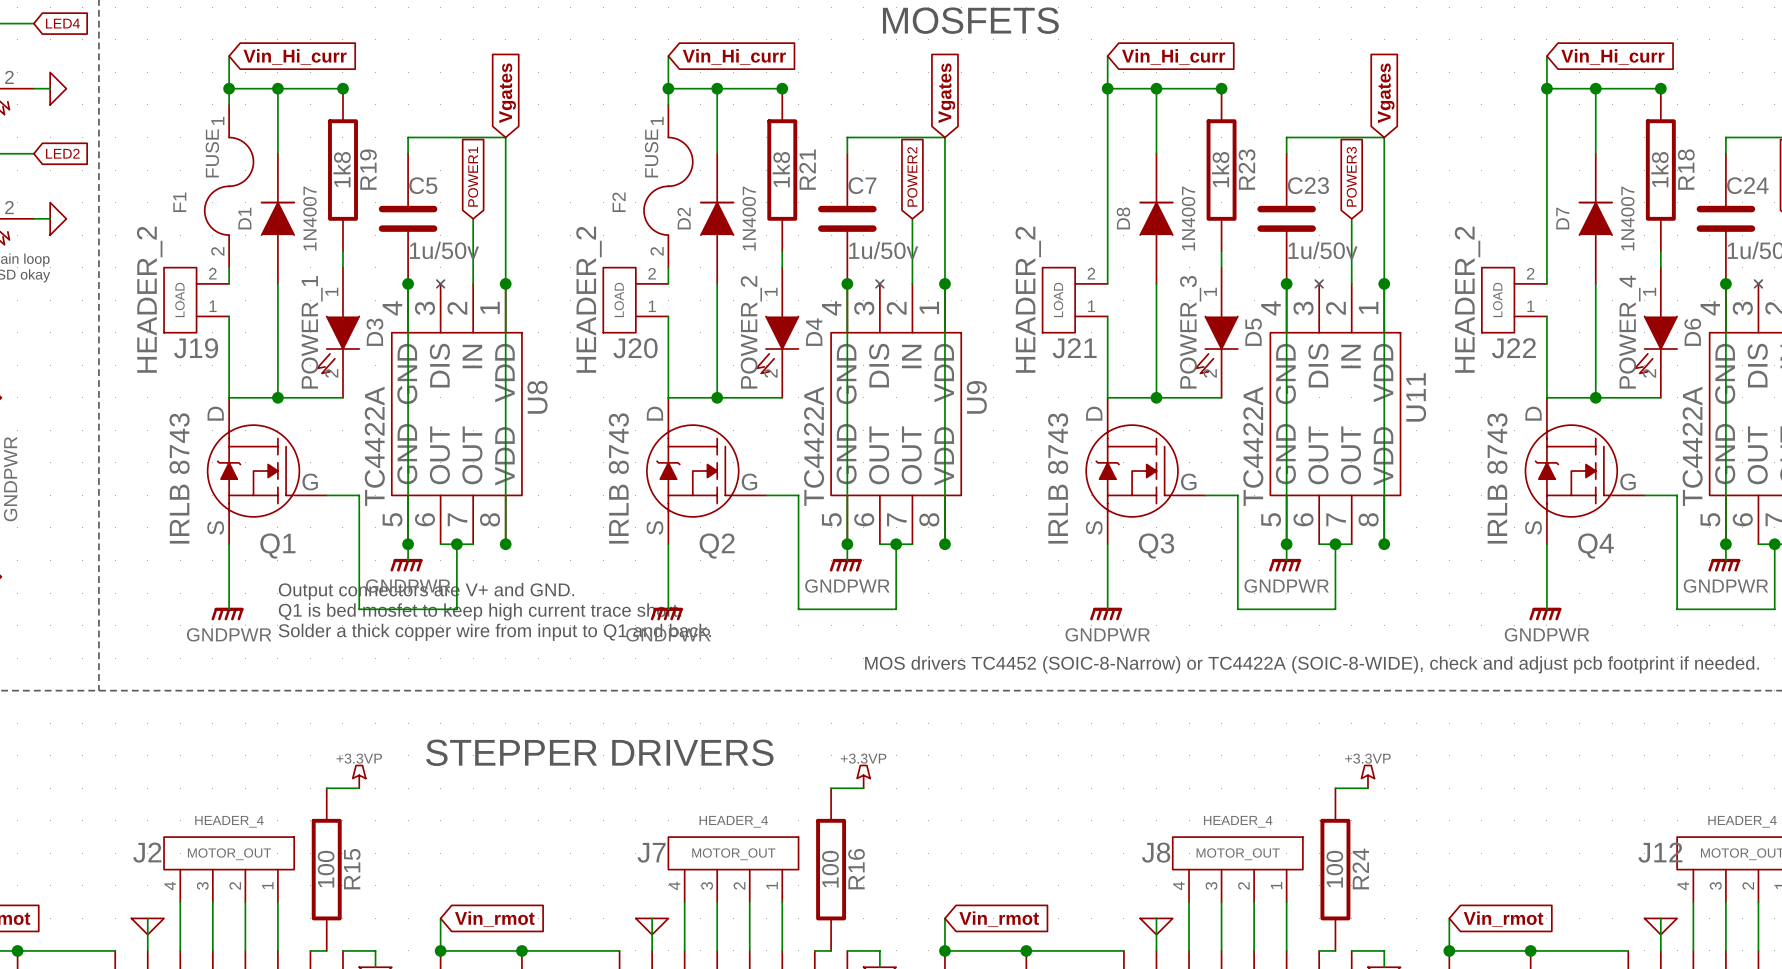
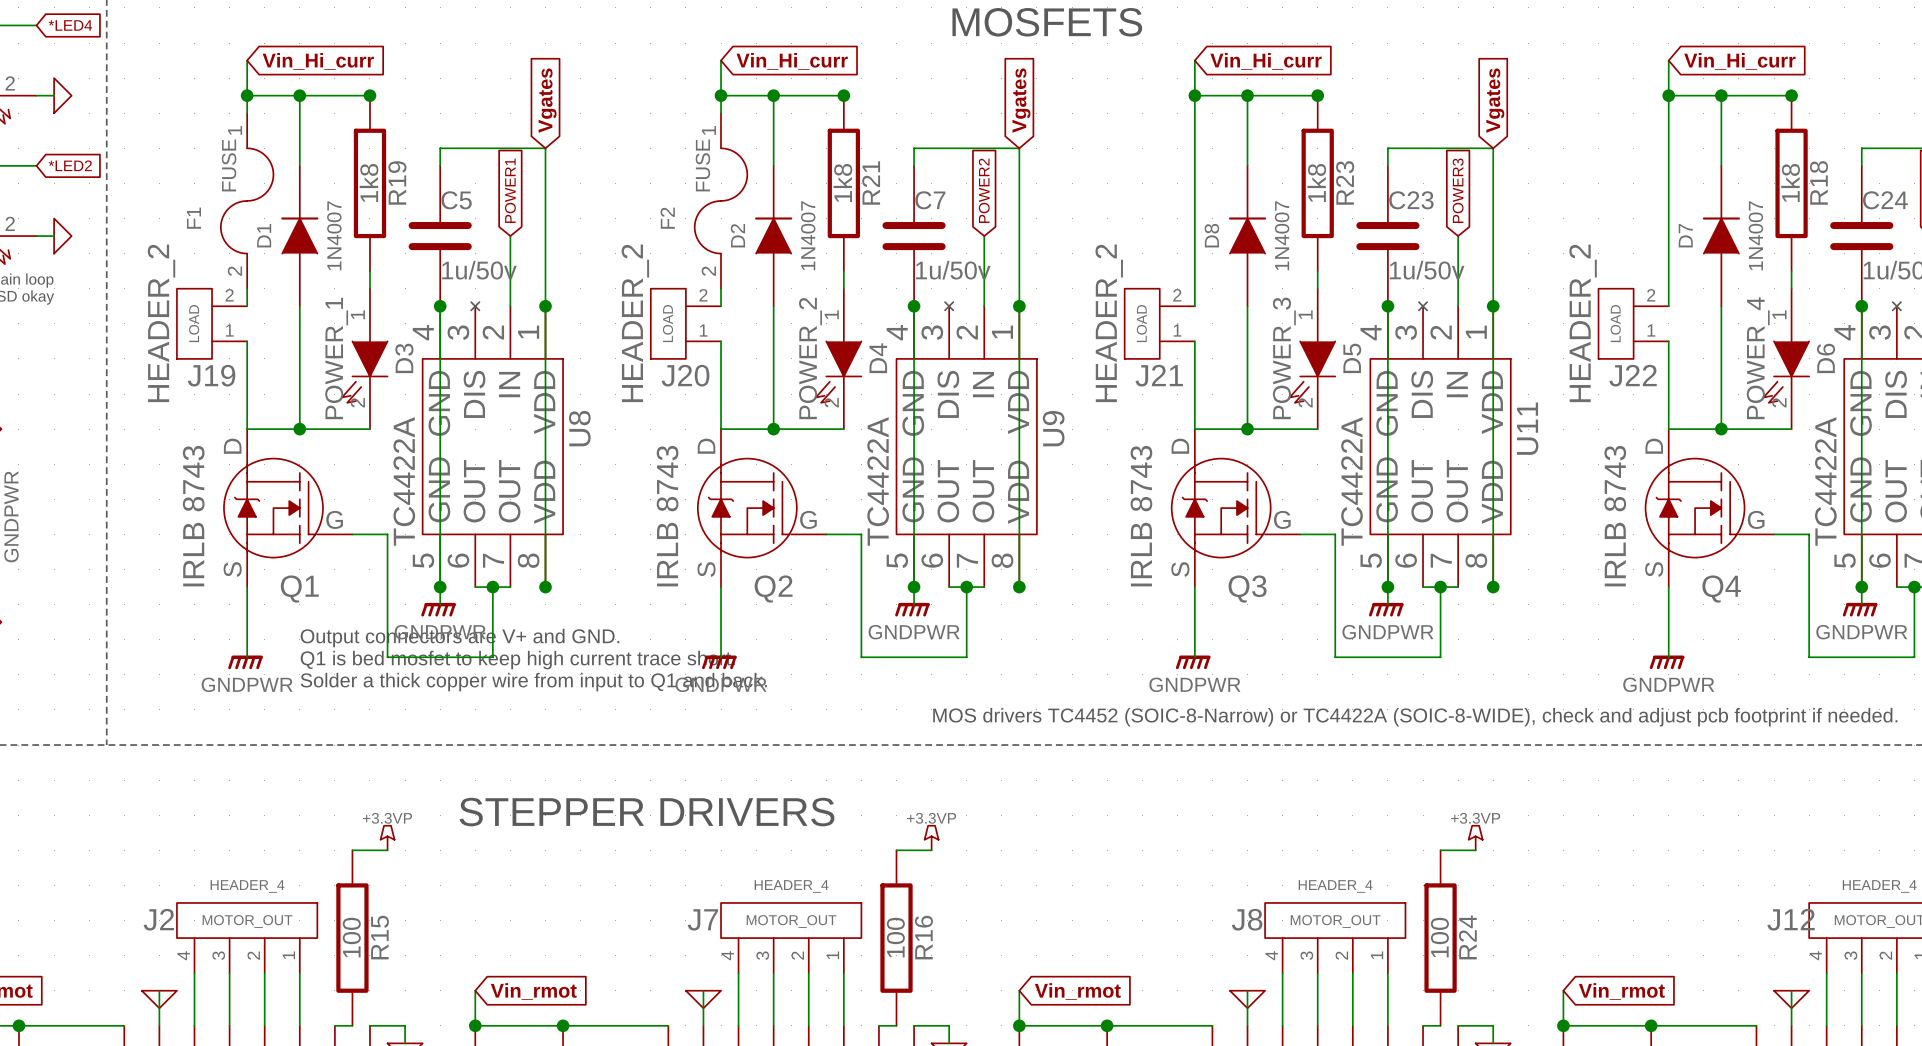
global label: LED4 (62, 23) -> *LED4 (70, 25)
global label: LED2 (62, 153) -> *LED2 (70, 165)

